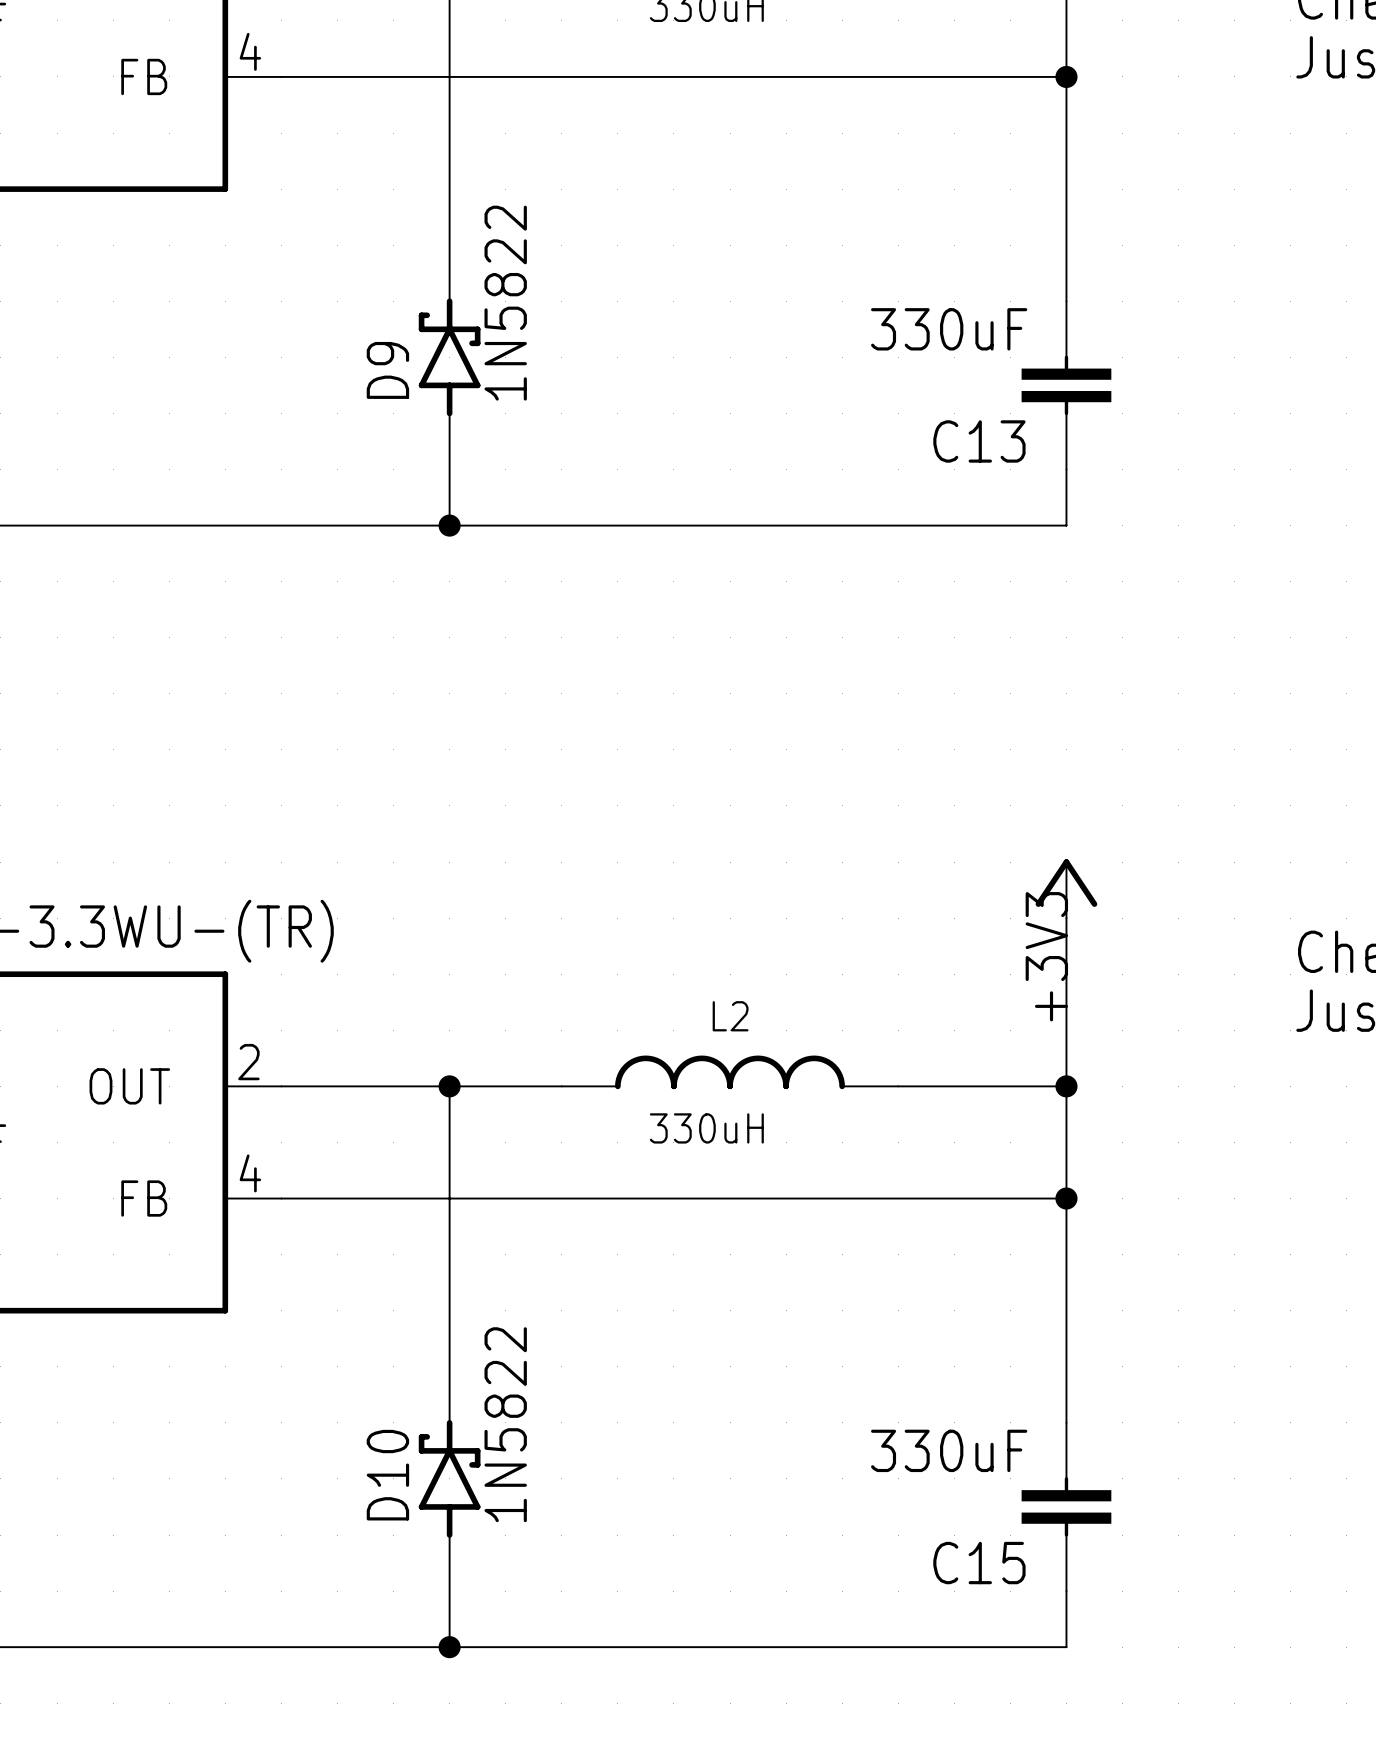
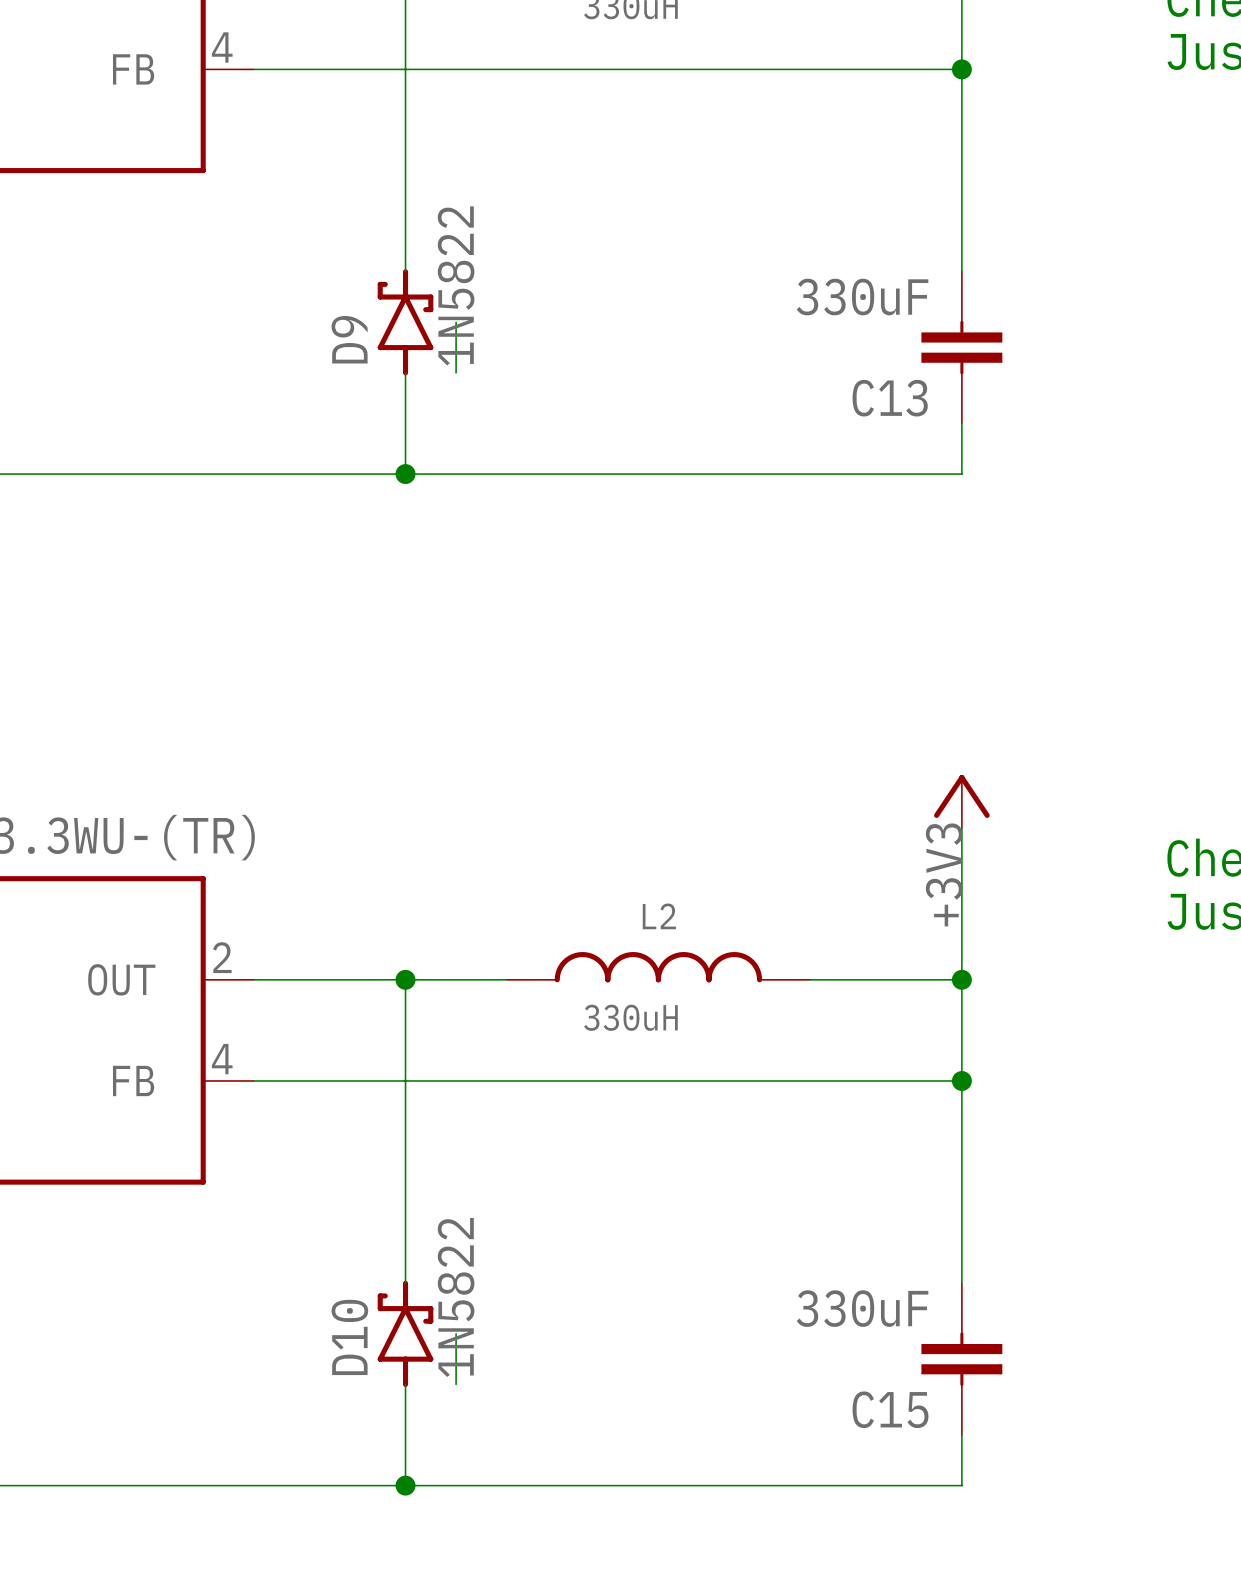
wire: none -> (456, 322) (456, 372)
wire: none -> (456, 1333) (456, 1384)

